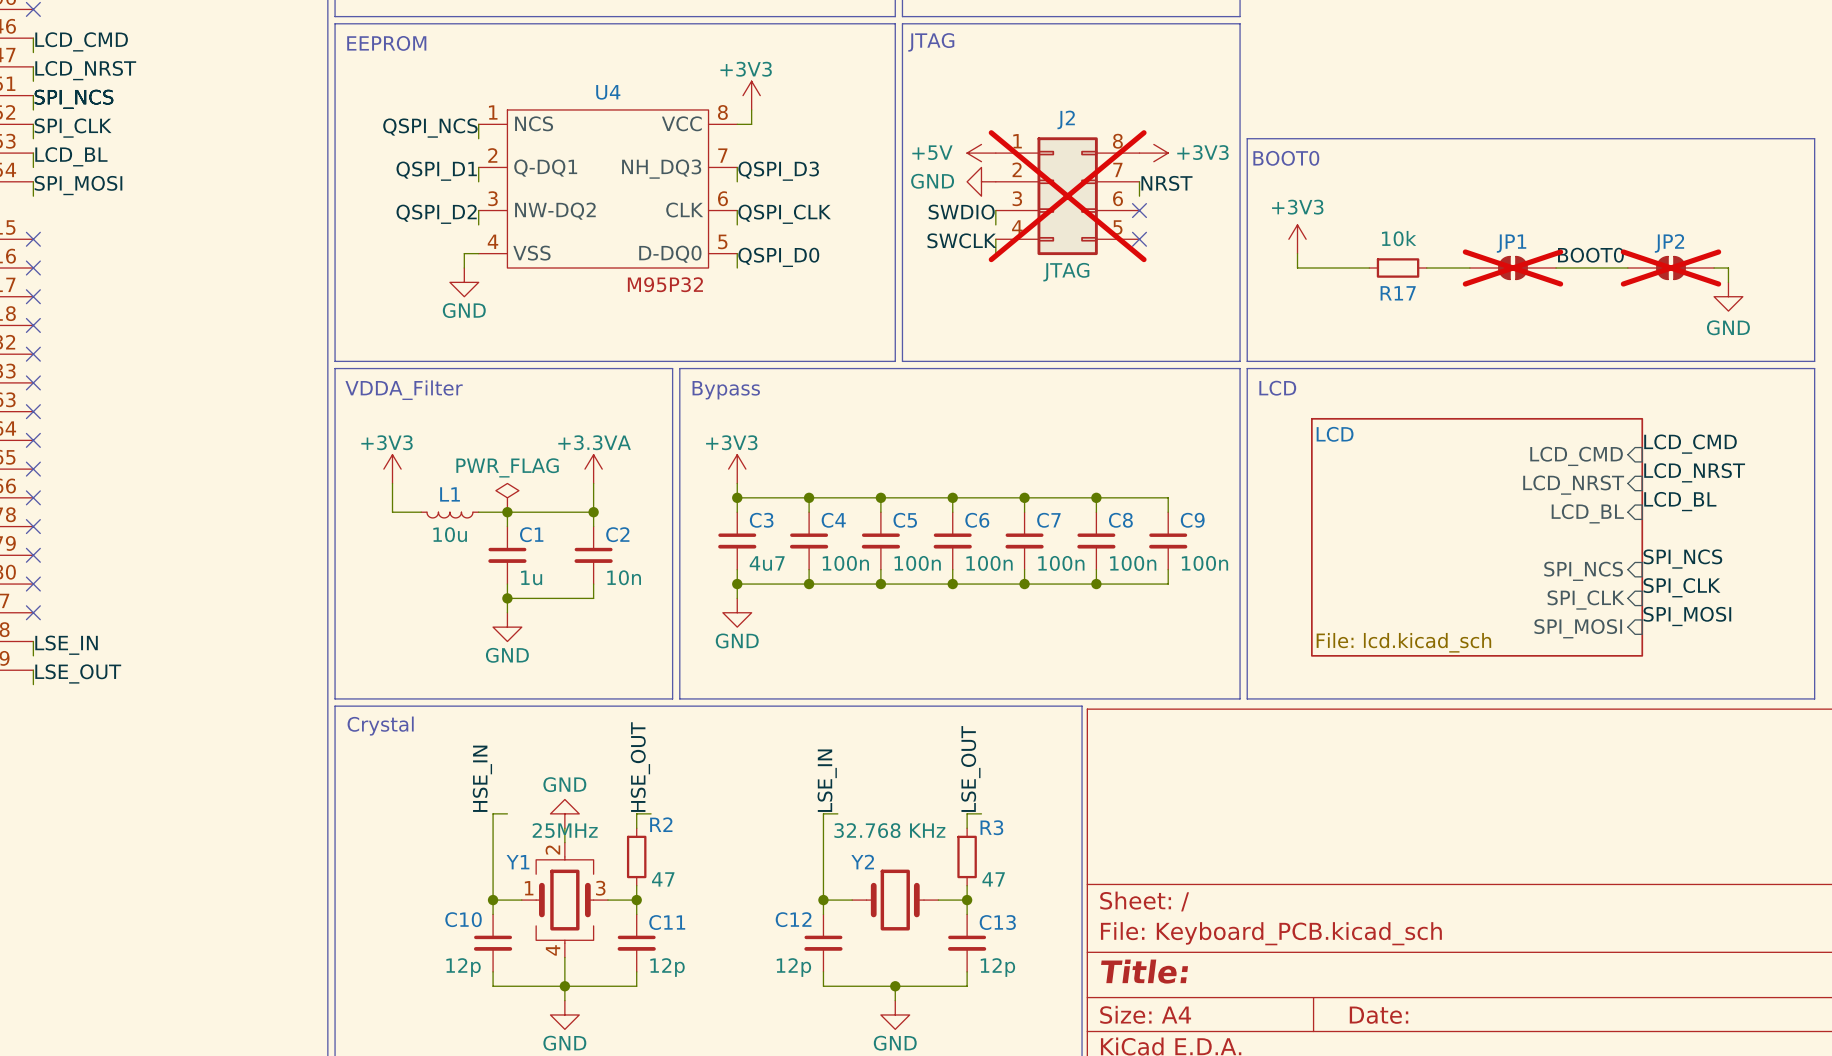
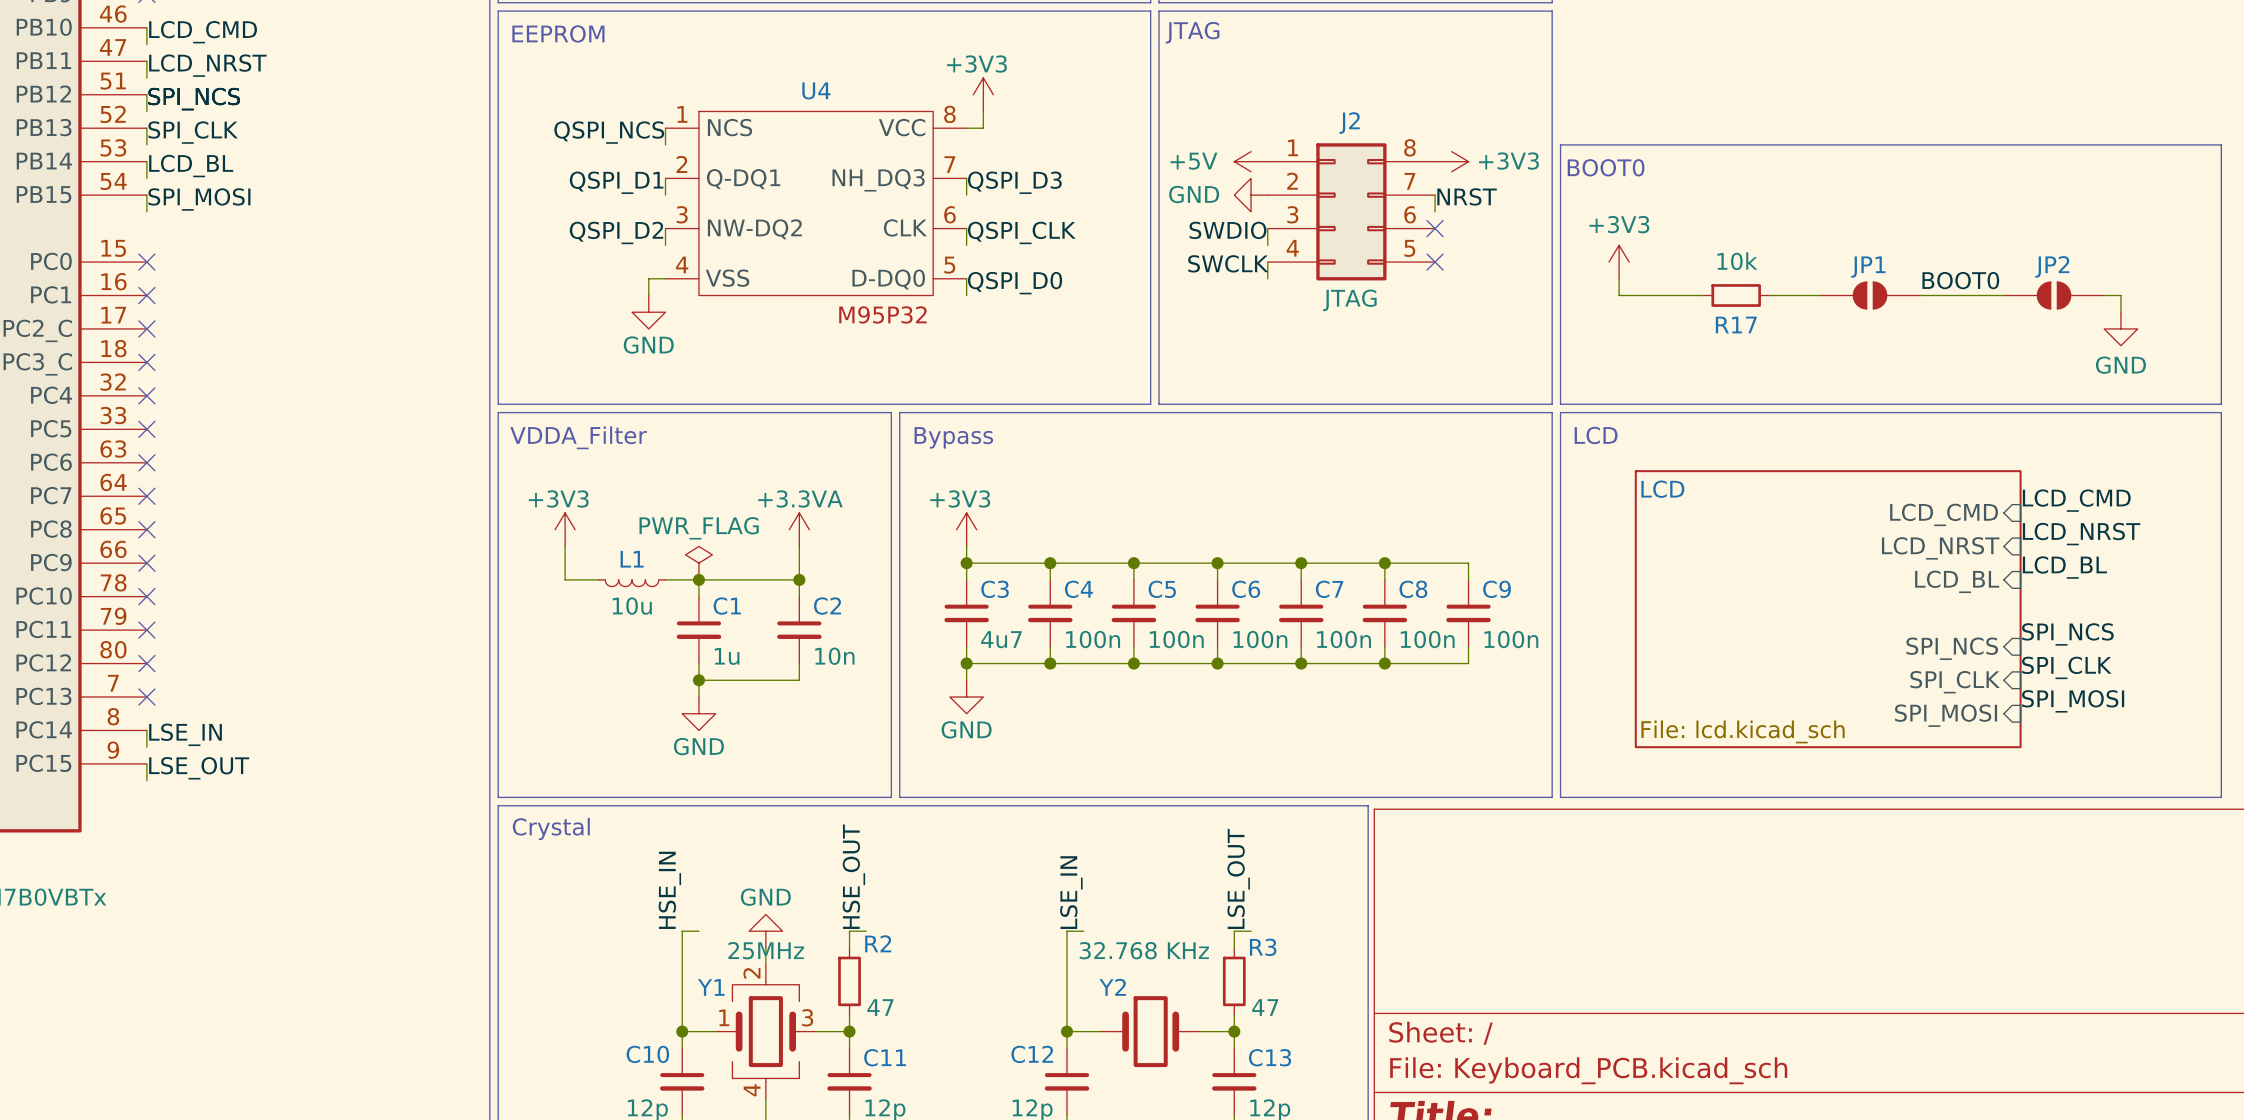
J2 do-not-place cross: (1067, 196) -> none
JP1 do-not-place cross: (1512, 268) -> none
JP2 do-not-place cross: (1670, 268) -> none

